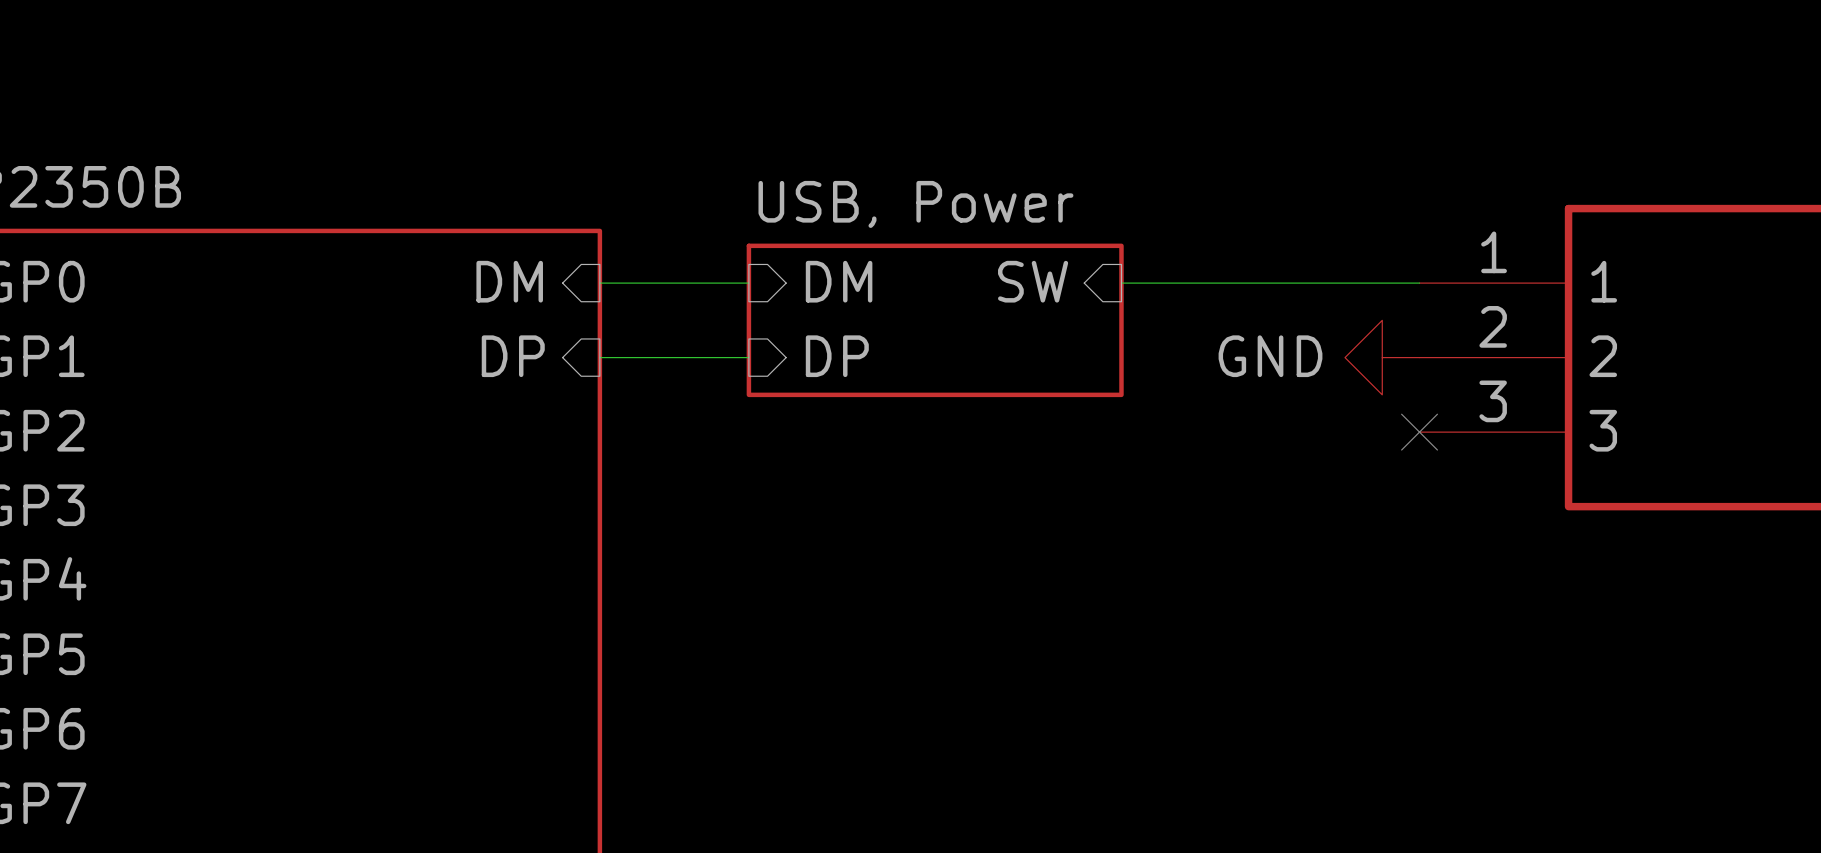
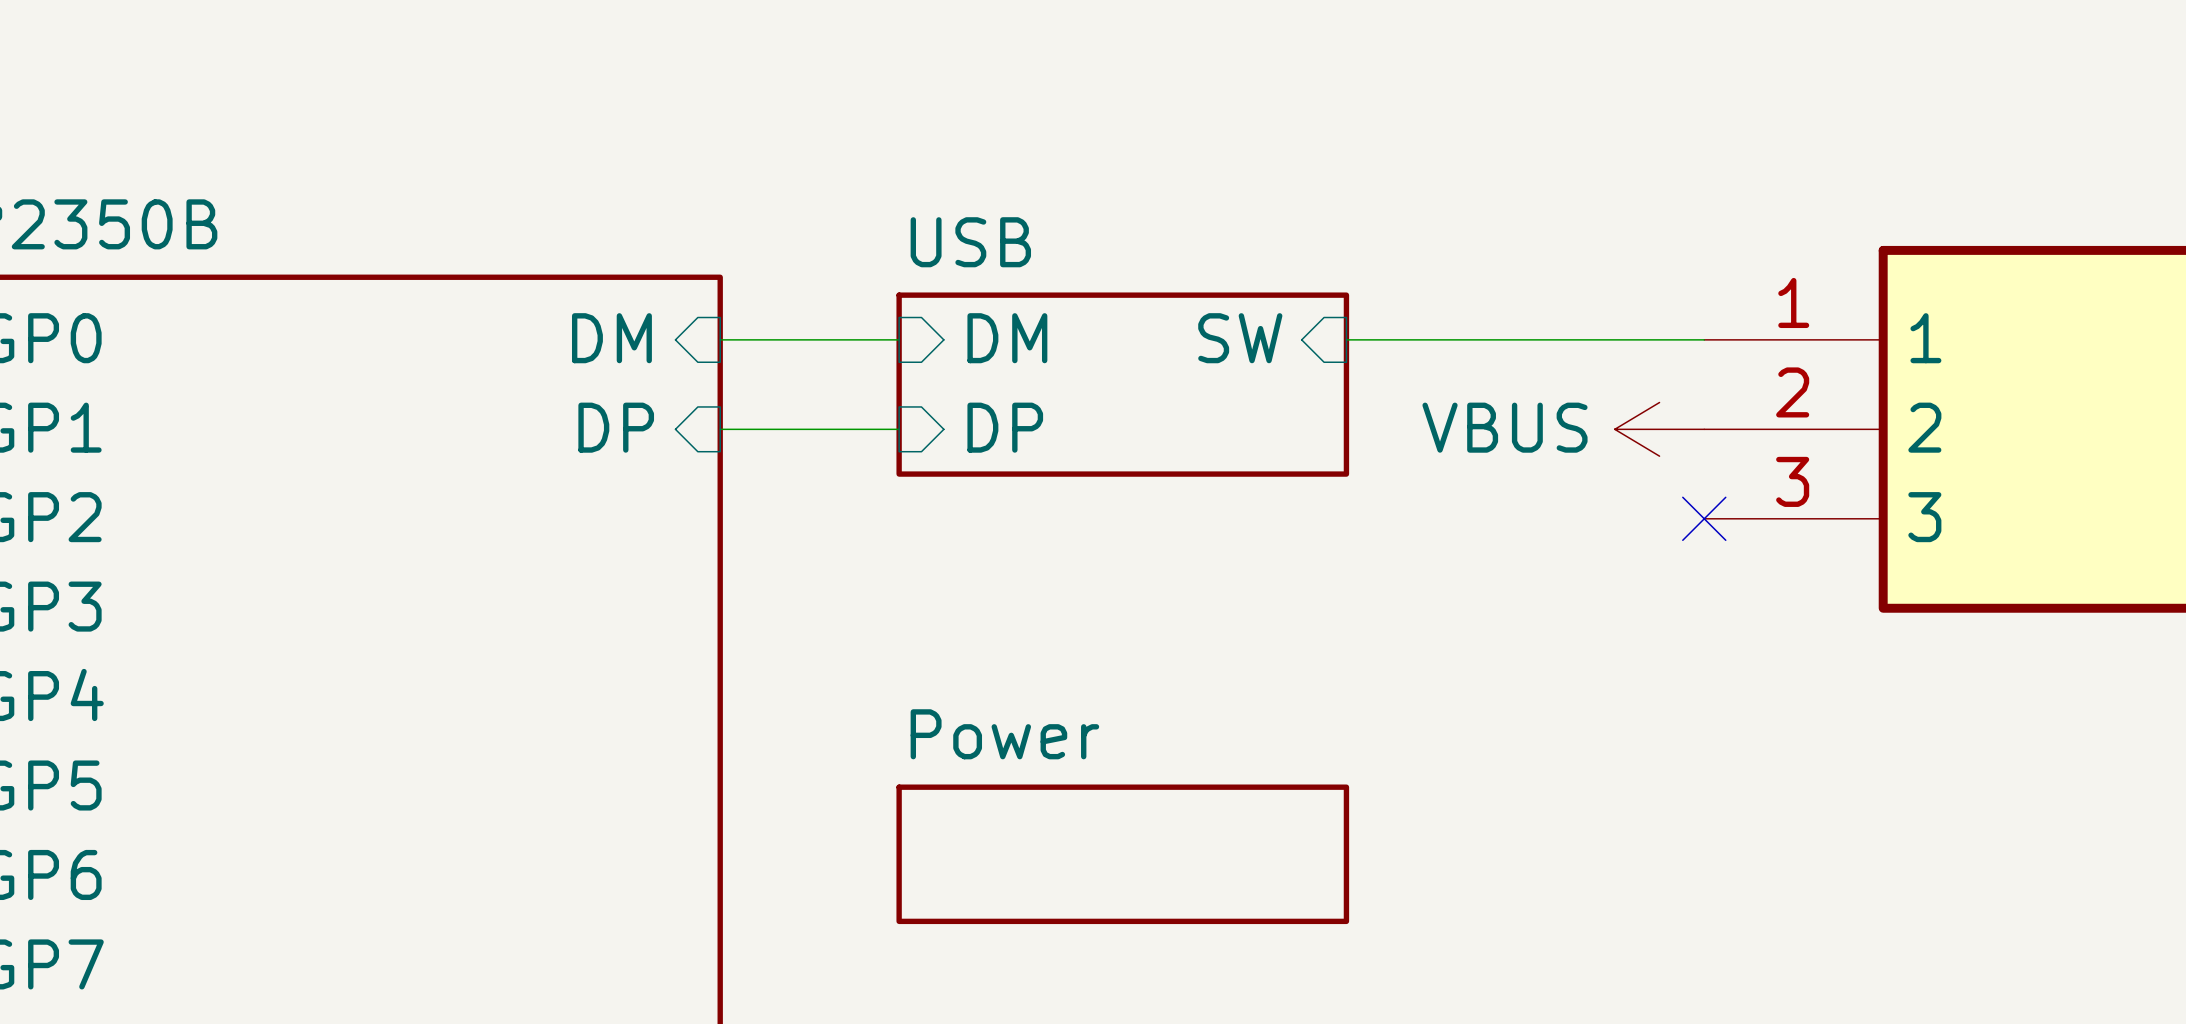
sheet USB, Power name: USB, Power (915, 204) -> USB (970, 242)
power symbol: GND (1382, 357) -> VBUS (1659, 429)
sheet Power: none -> (1122, 854)

